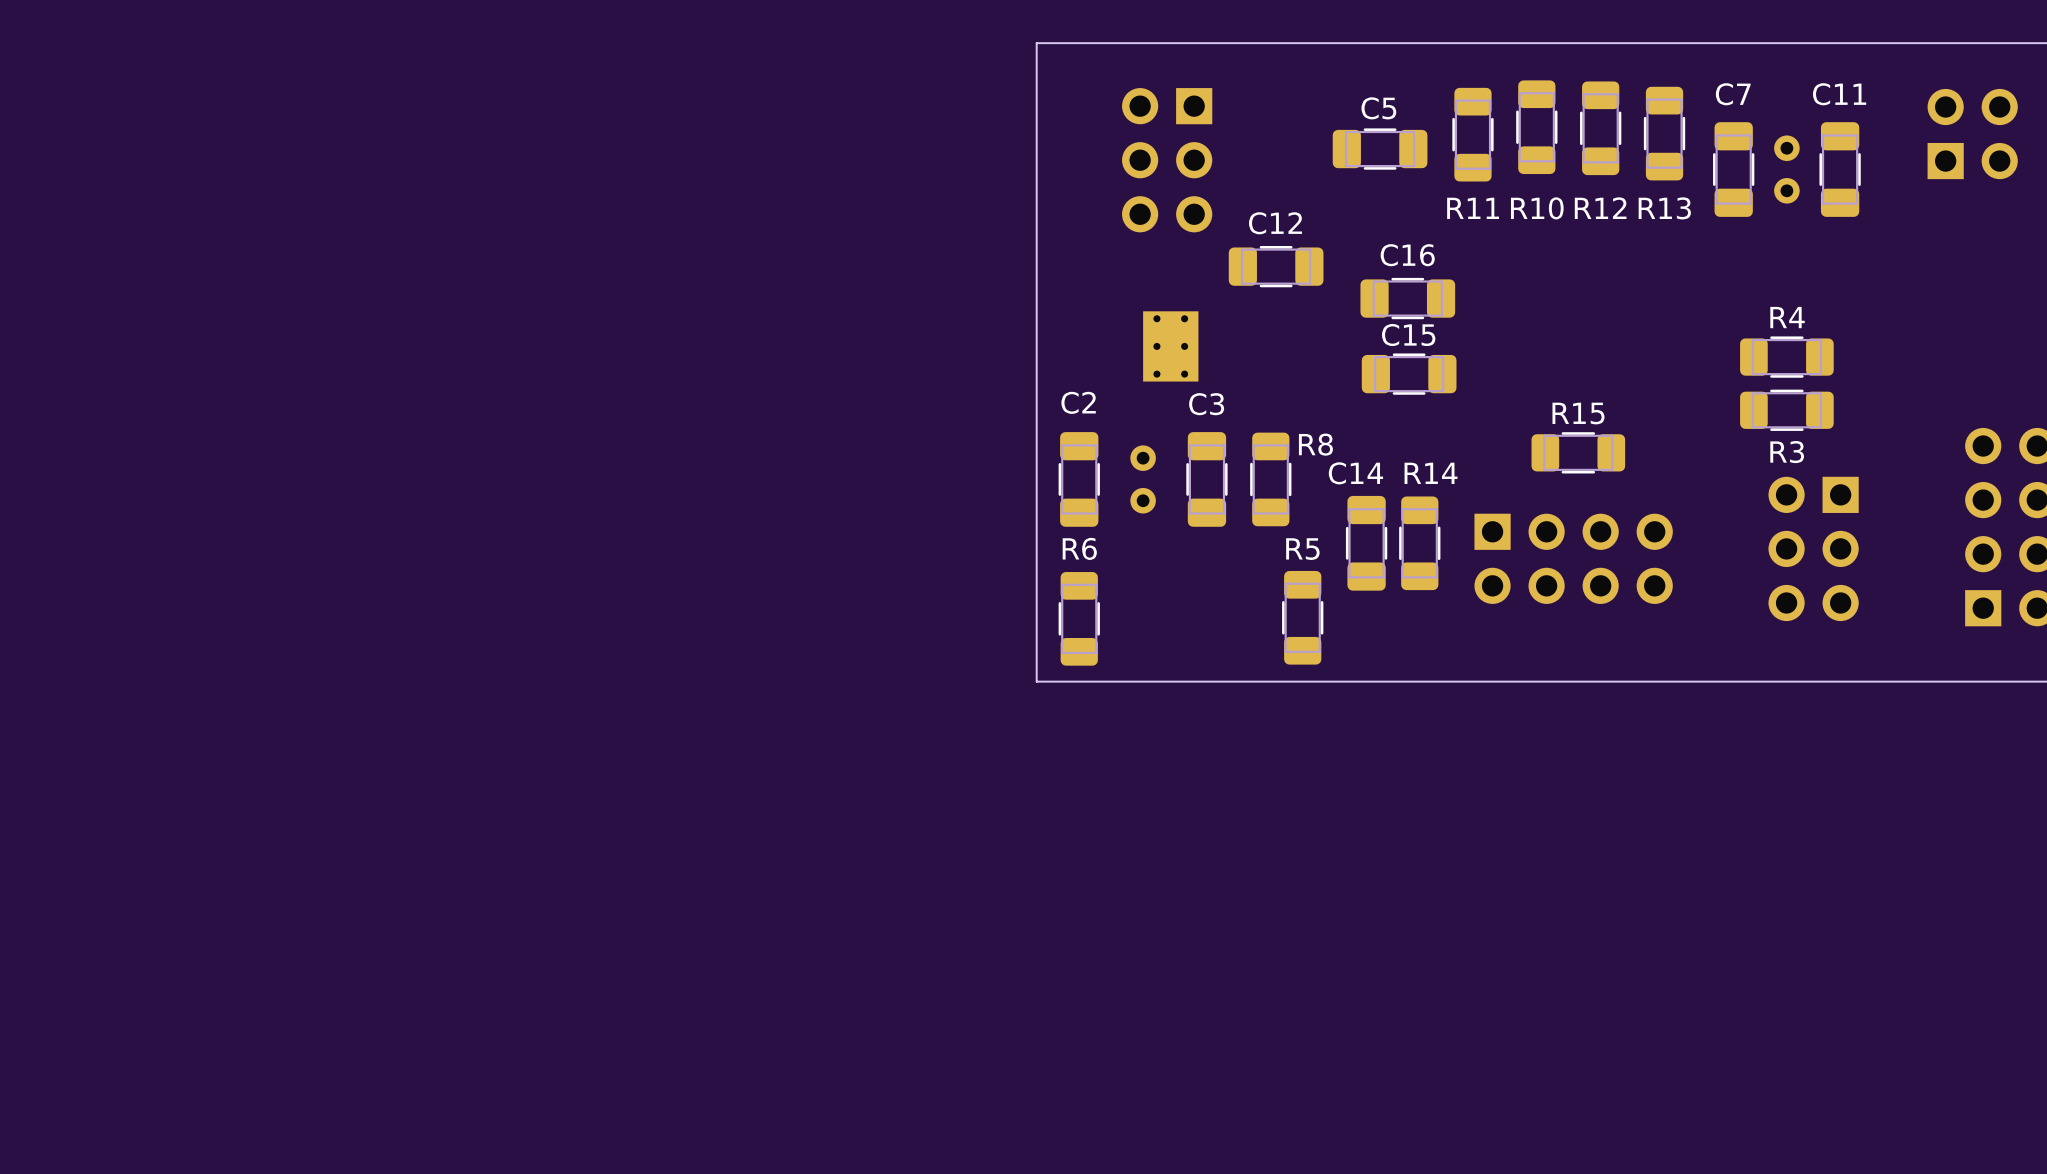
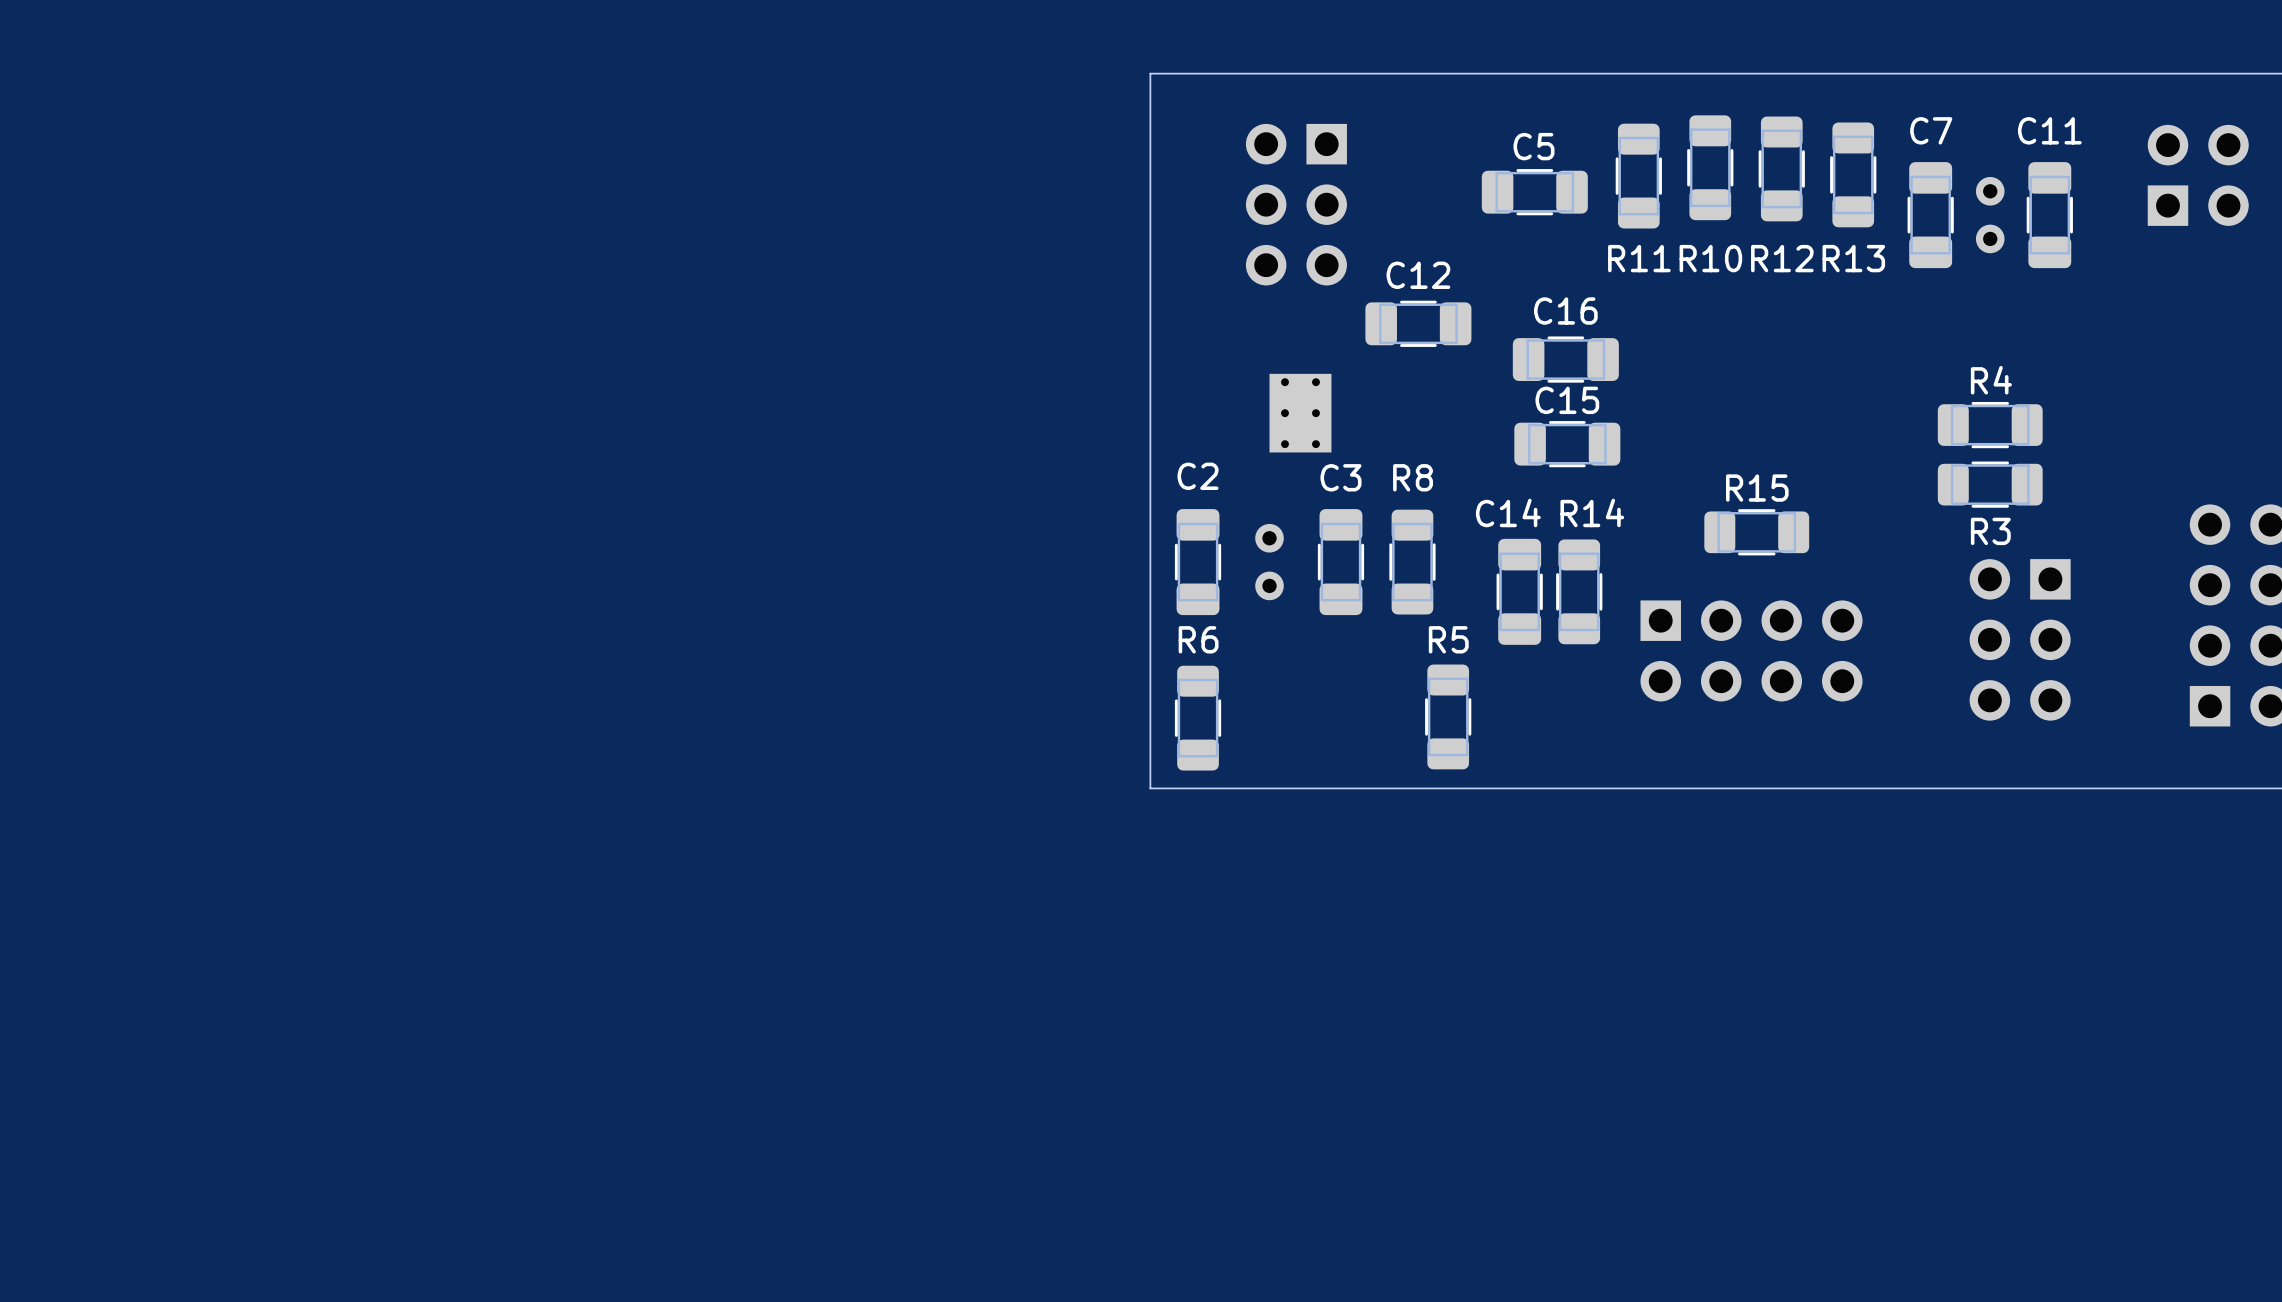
R8 name position: R8 (1315, 444) -> R8 (1413, 477)
C14 position: (1366, 543) -> (1519, 591)
R14 position: (1419, 543) -> (1579, 591)

